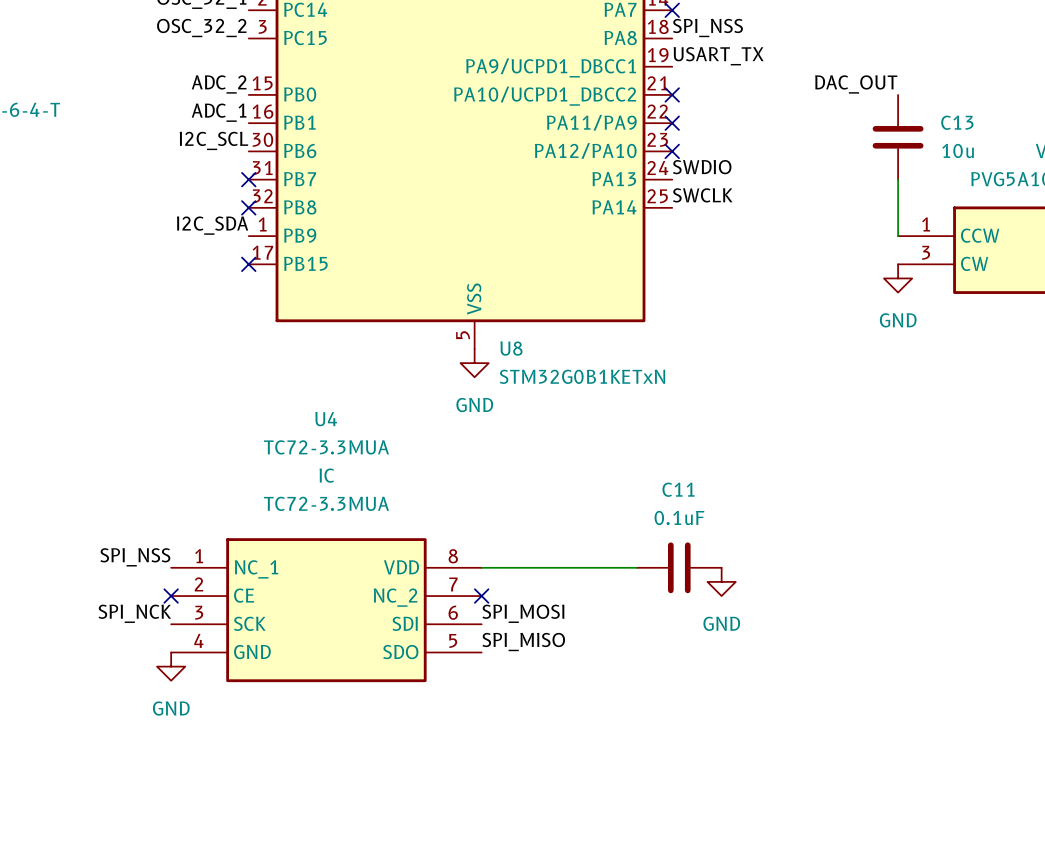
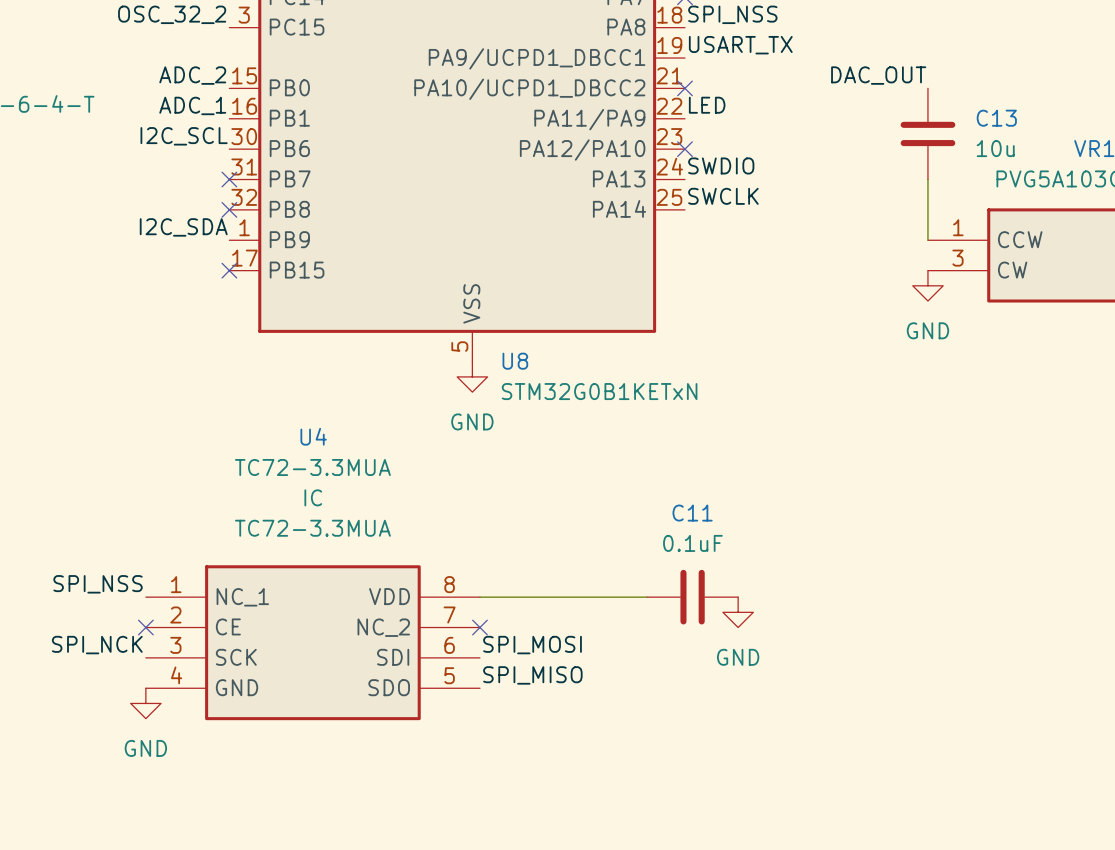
label: none -> LED (707, 105)
no-connect mark: (672, 123) -> none

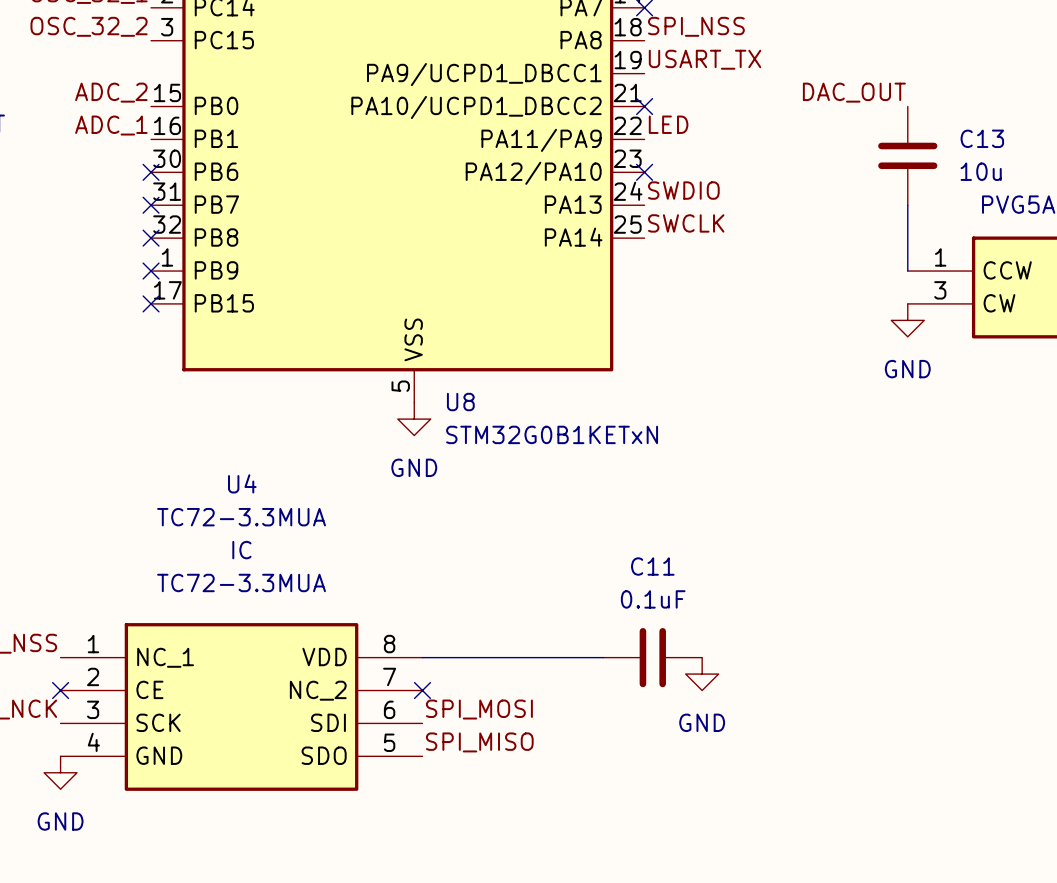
label: I2C_SCL (184, 136) -> none
no-connect mark: none -> (151, 172)
label: I2C_SDA (183, 227) -> none
no-connect mark: none -> (151, 271)

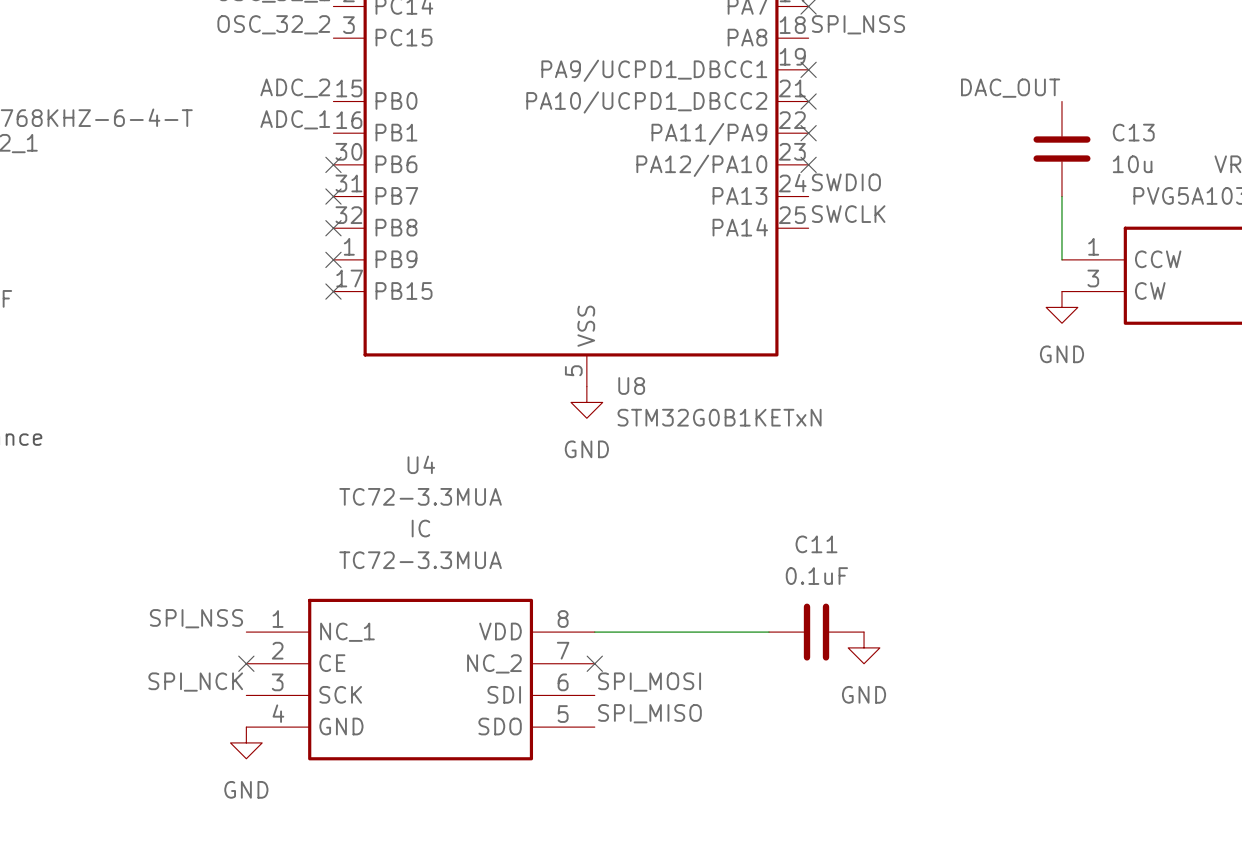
label: USART_TX (705, 59) -> none
no-connect mark: none -> (808, 69)
label: LED (668, 124) -> none
no-connect mark: none -> (808, 133)

